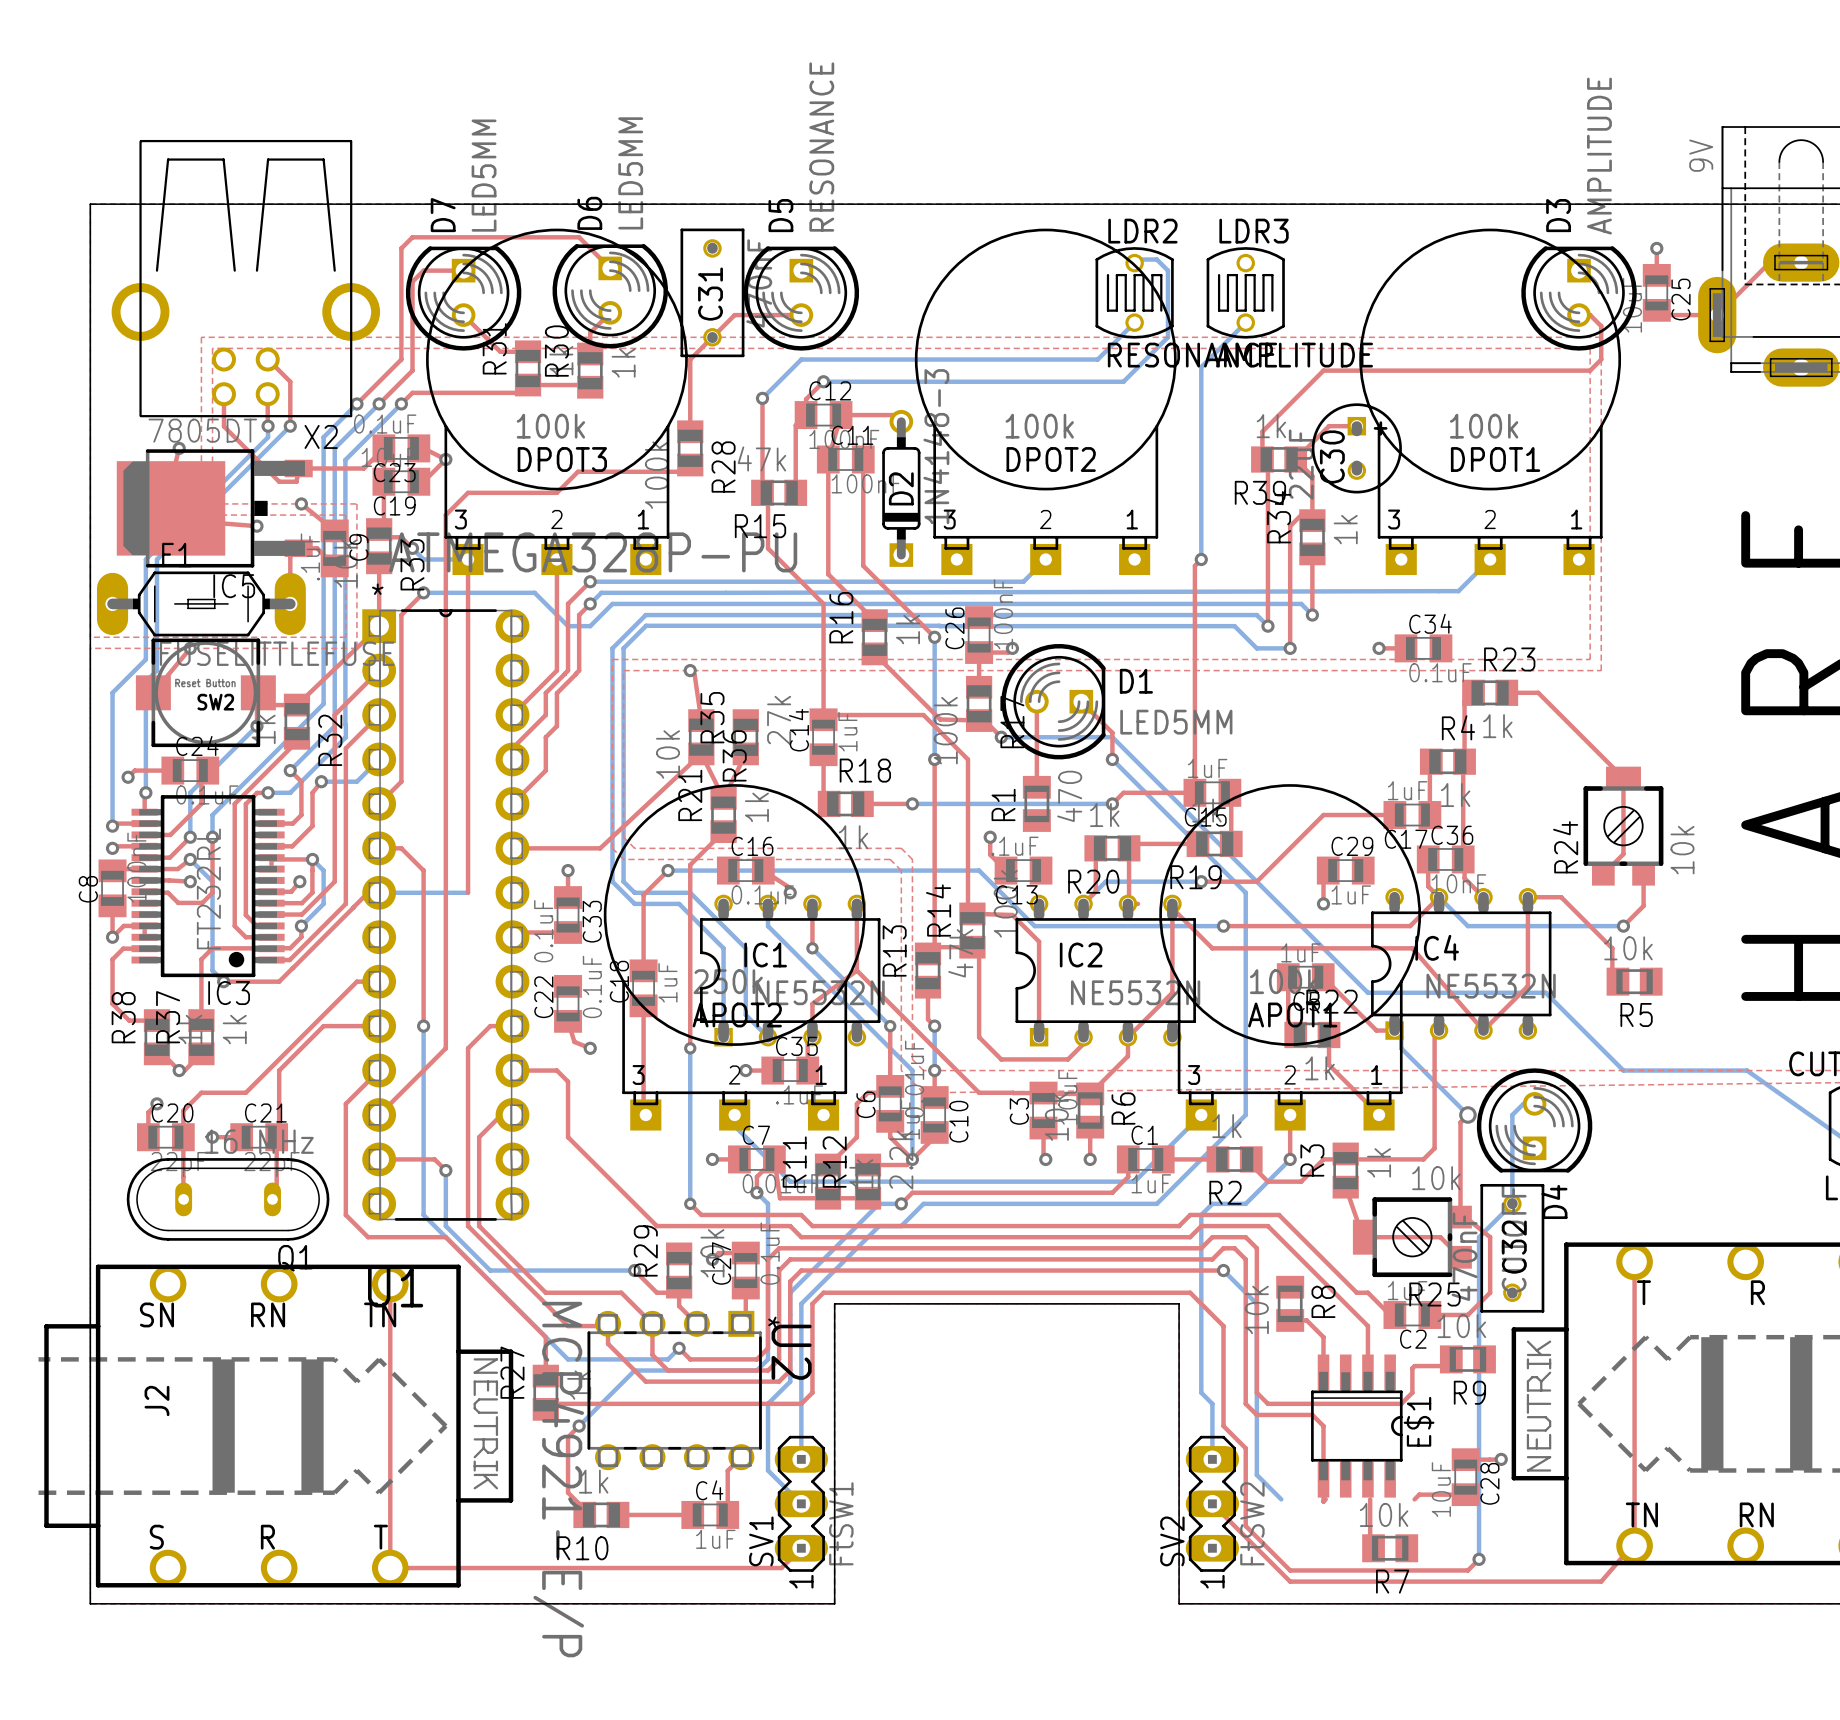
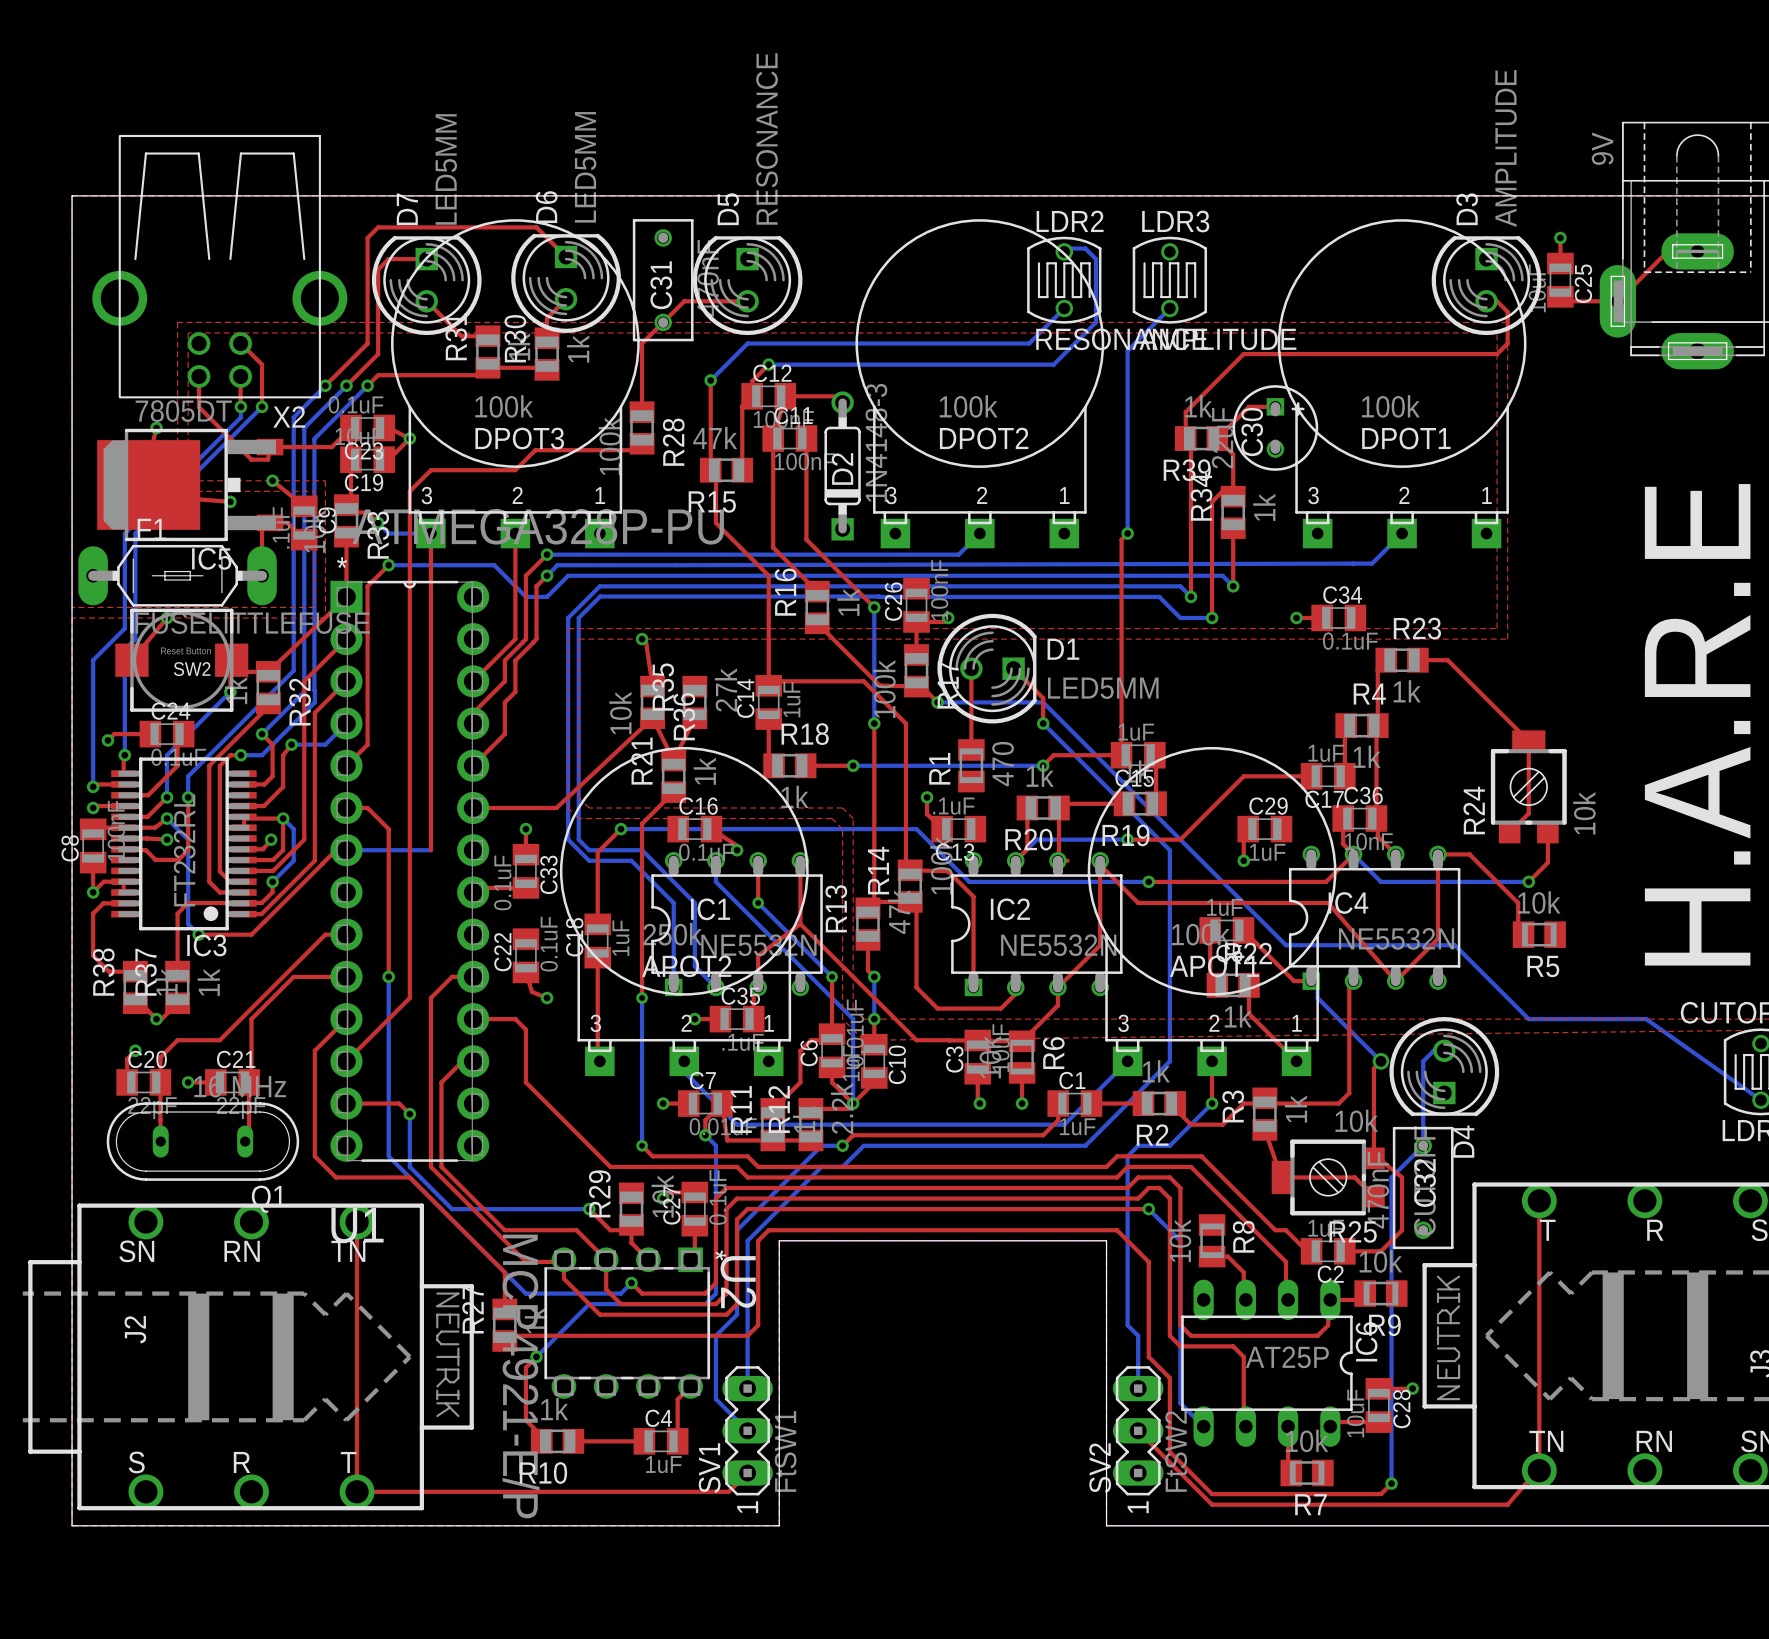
E$1: (1356, 1426) -> none
IC6: none -> AT25P (1266, 1363)

